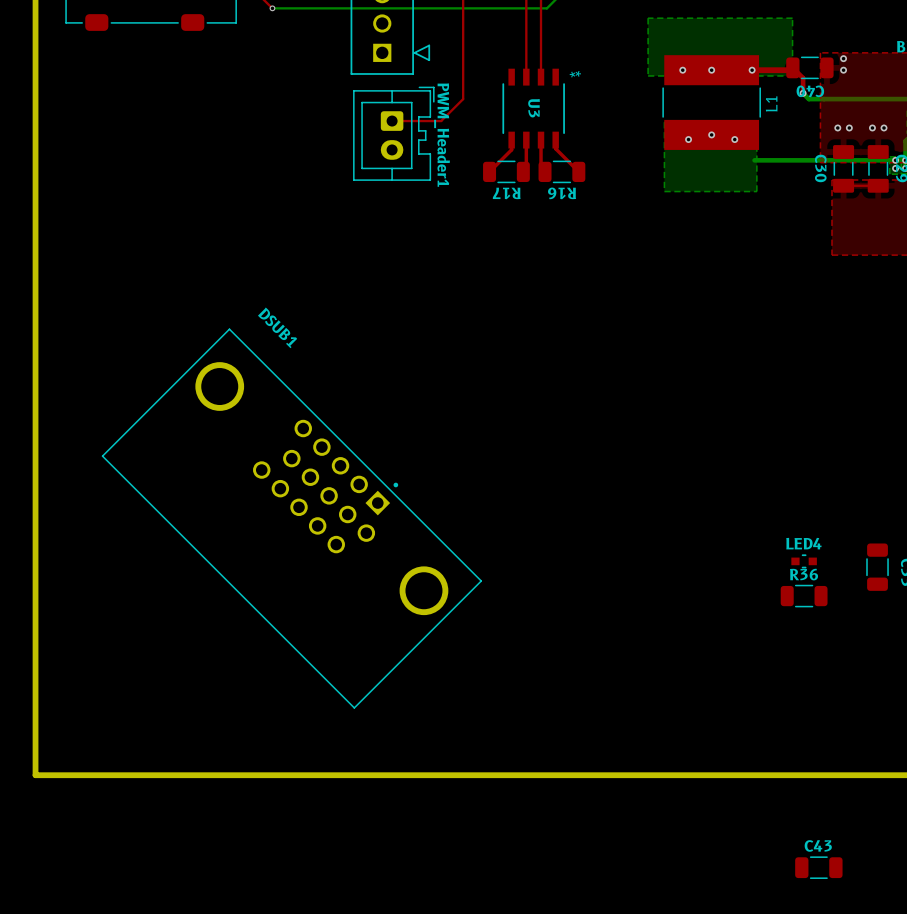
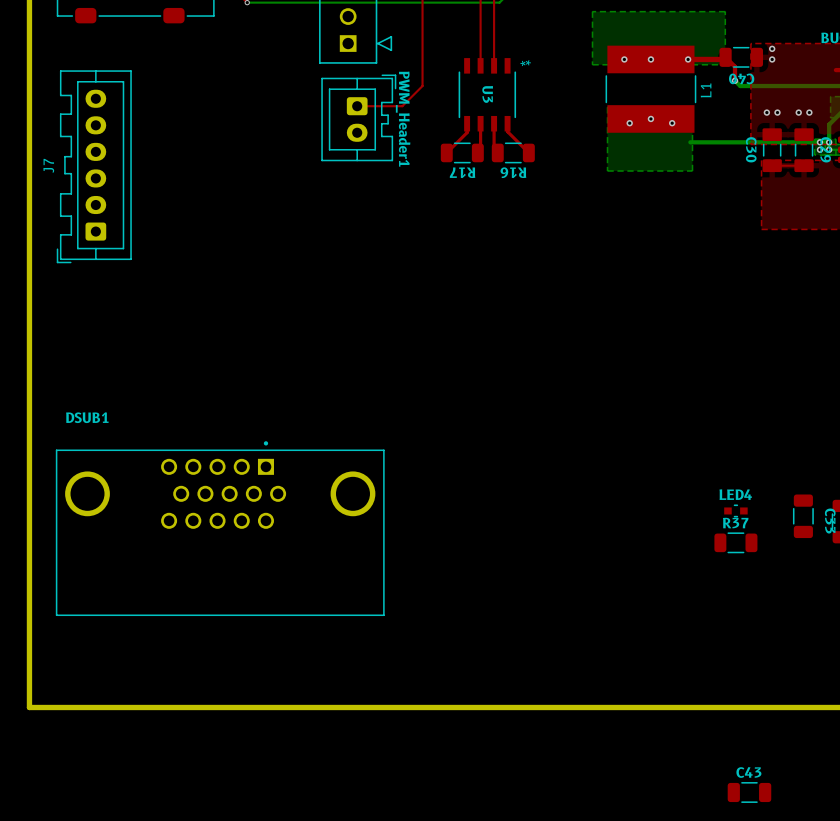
J7: none -> (94, 166)
DSUB1 rotation: 0° (291, 518) -> 45° counterclockwise (220, 528)
R36 name: R36 (804, 574) -> R37 (735, 523)

